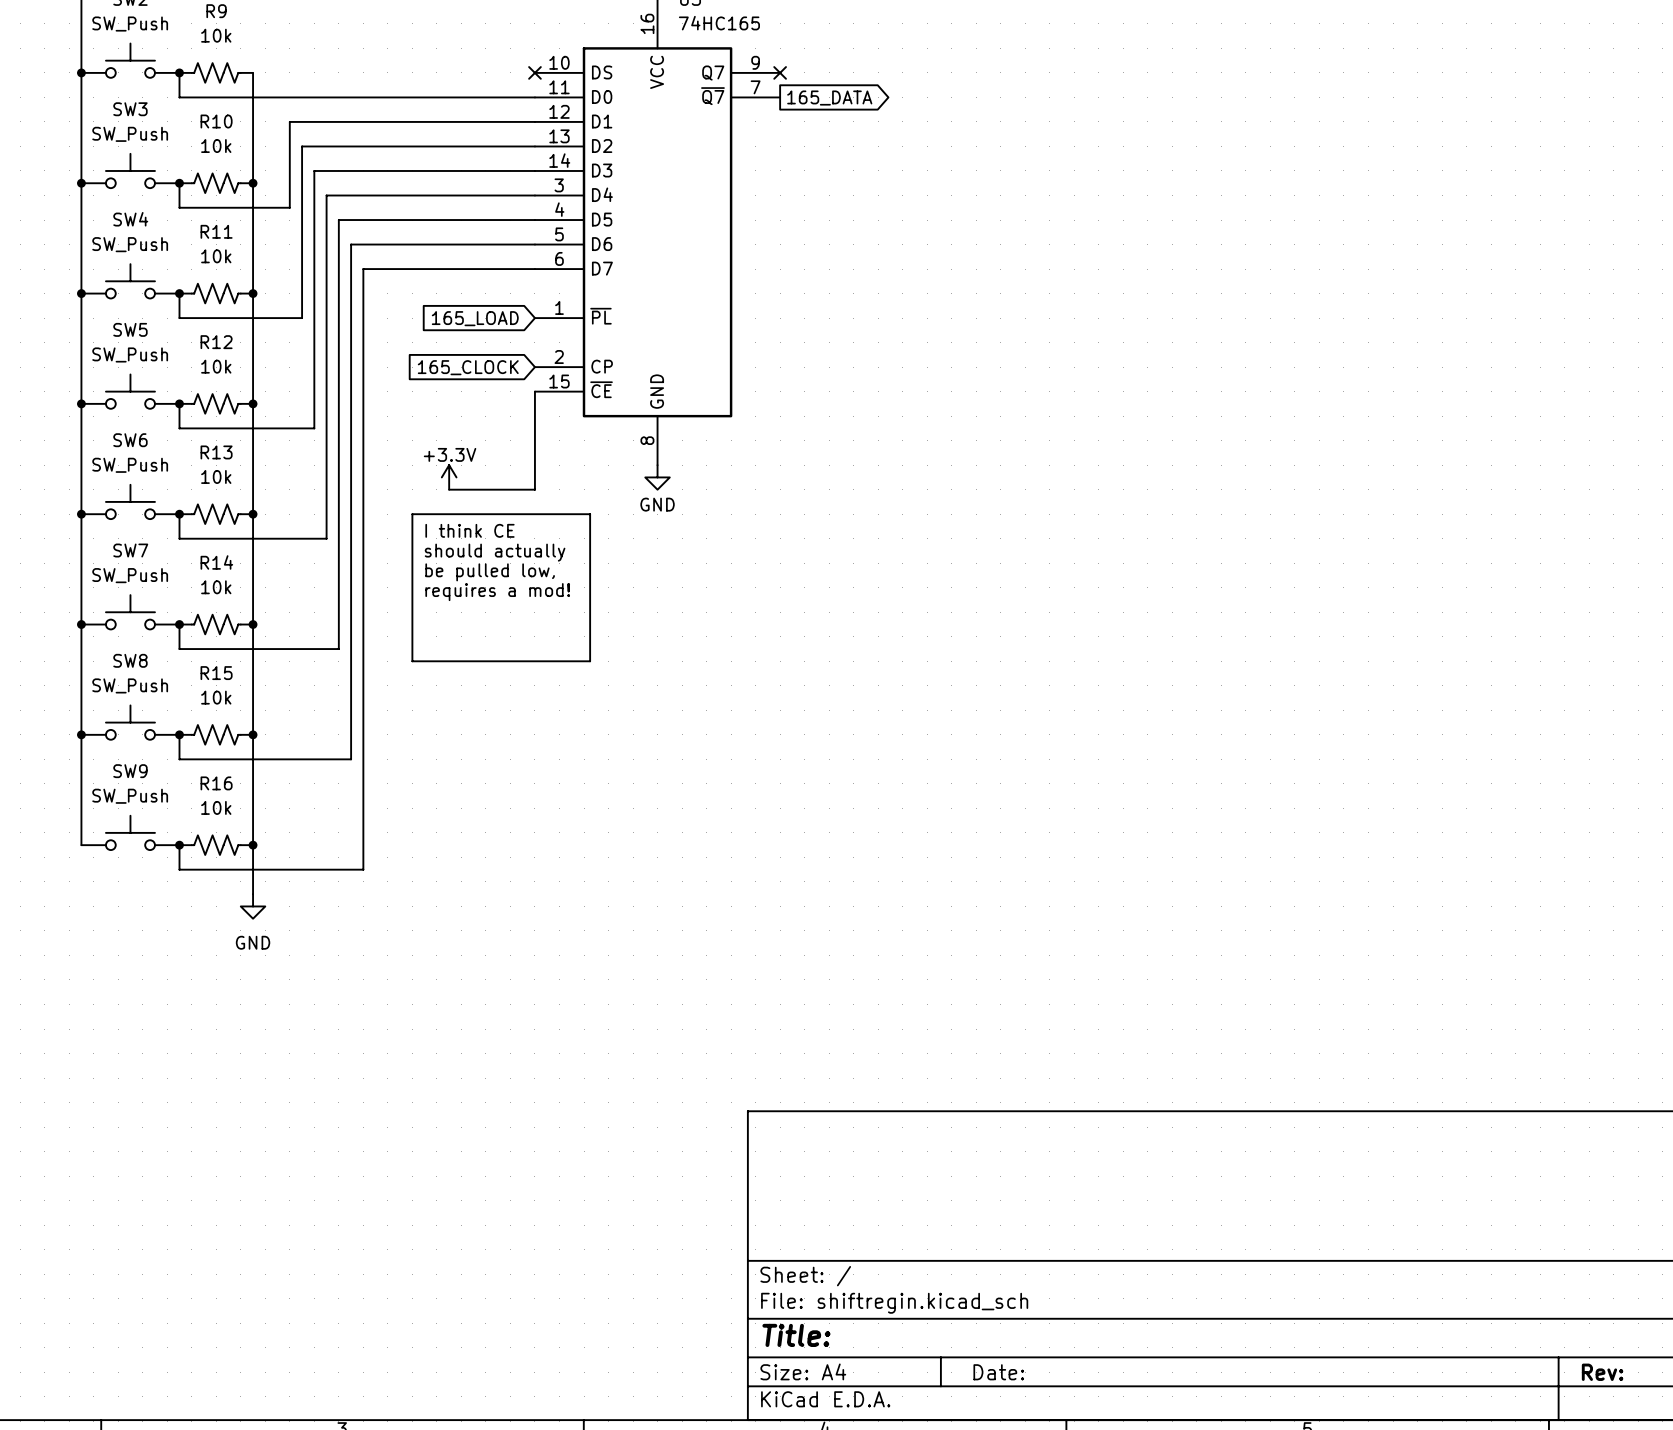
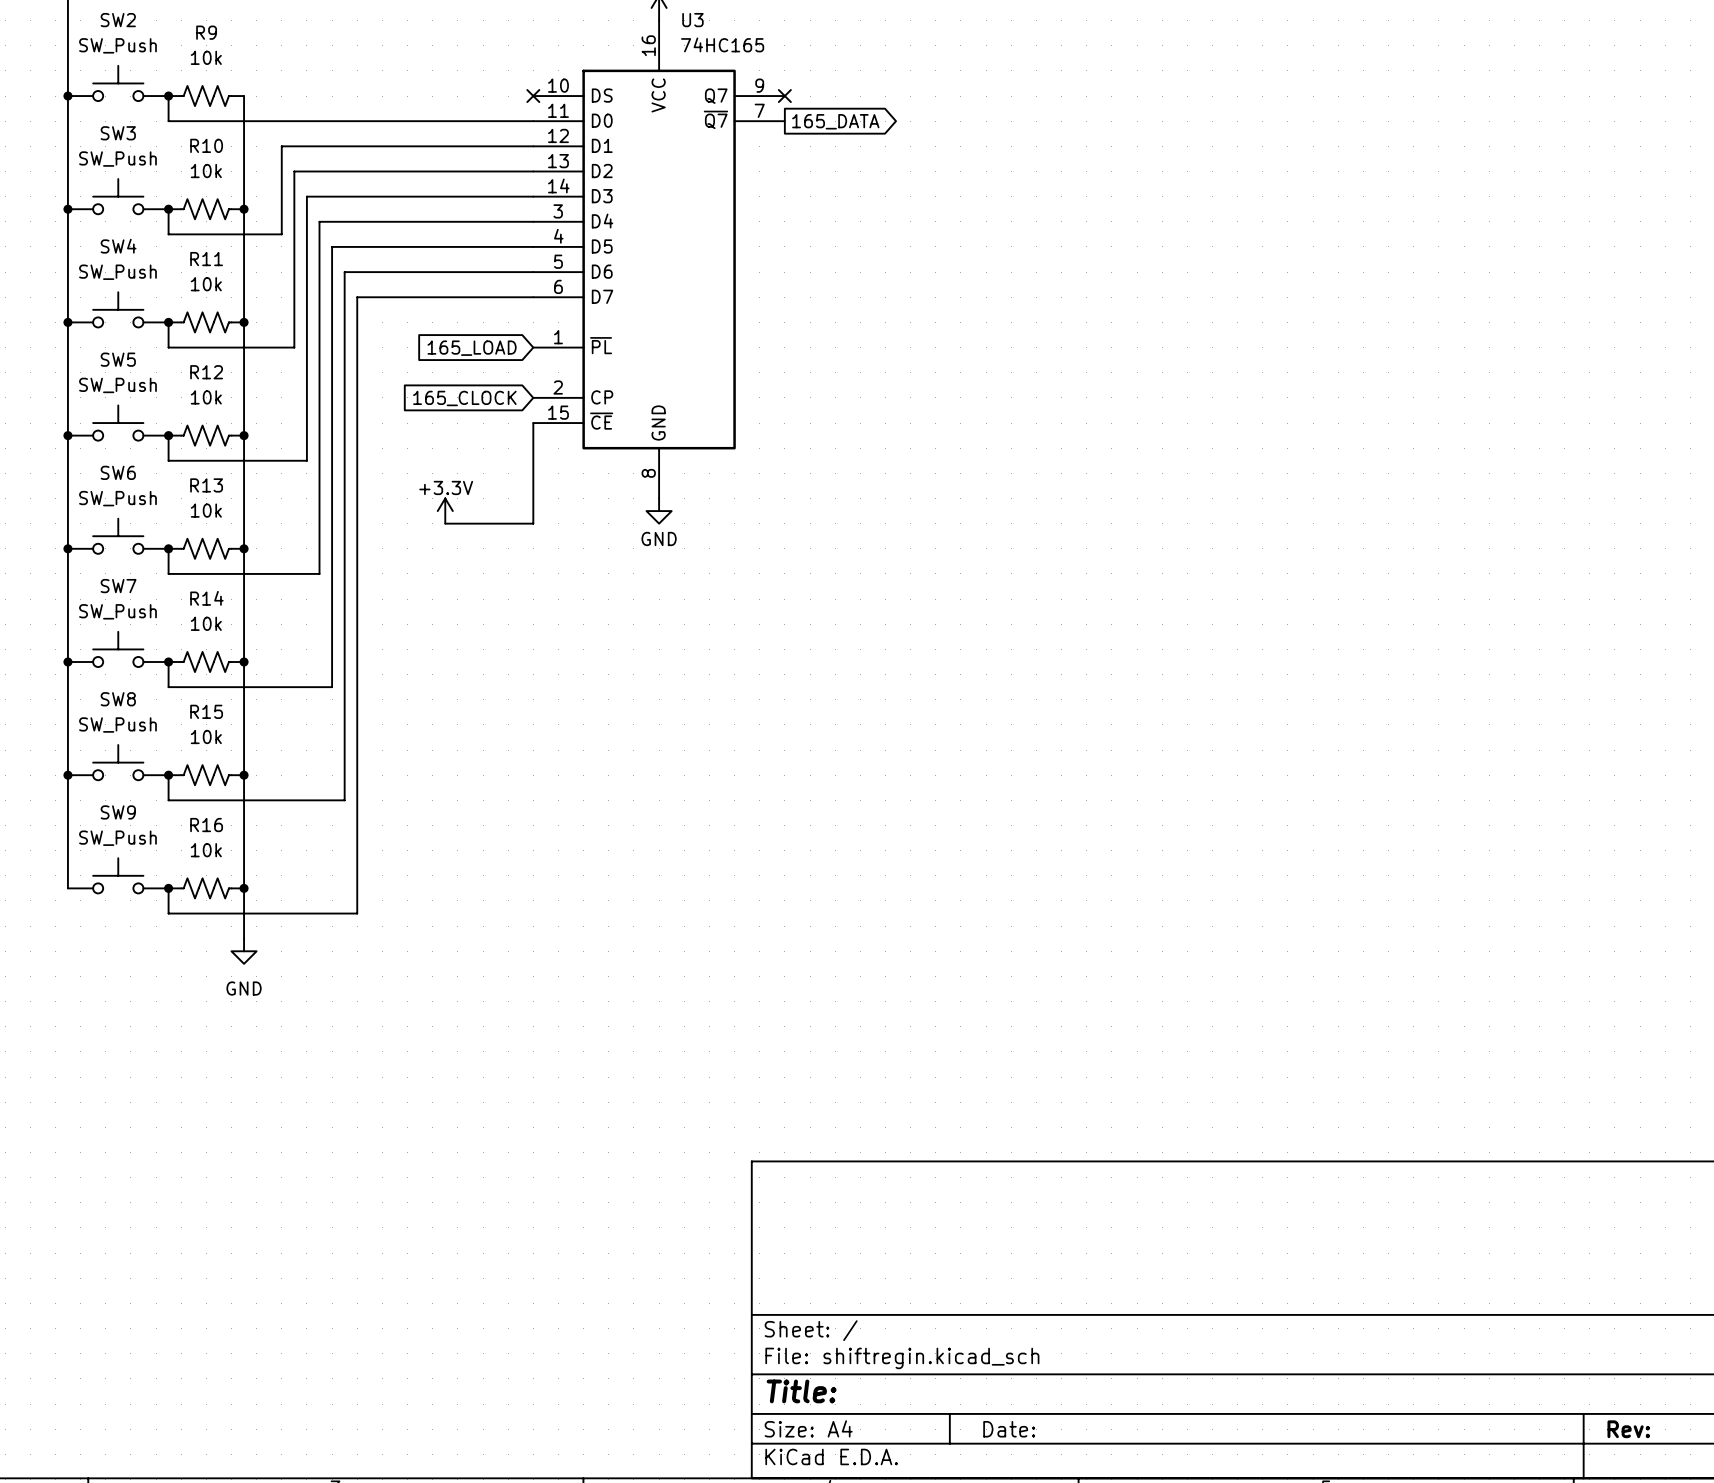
line: (412, 514) (590, 514) (590, 661) (412, 661) (412, 514) -> none
text: I think CE (469, 530) -> none
text: should actually (495, 552) -> none
text: be pulled low, (490, 572) -> none
text: requires a mod! (497, 592) -> none

